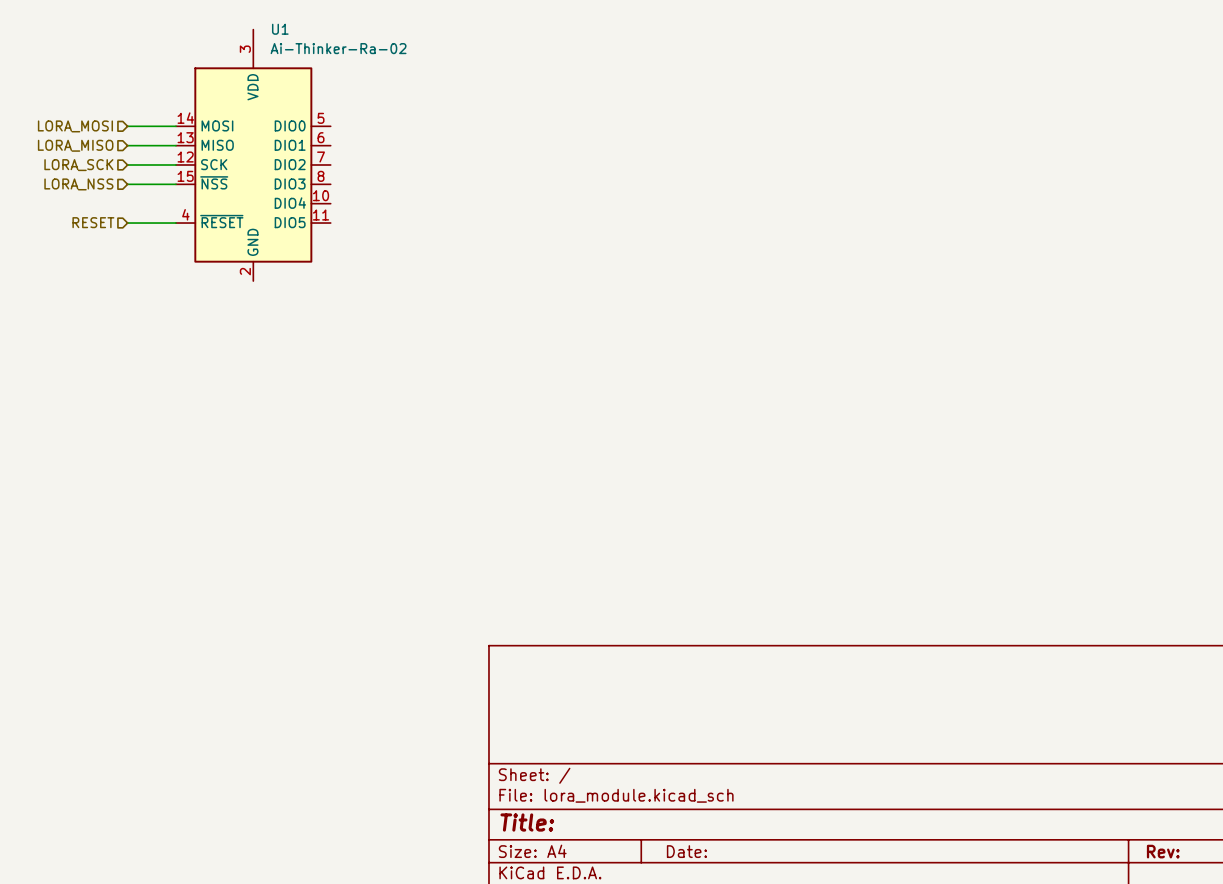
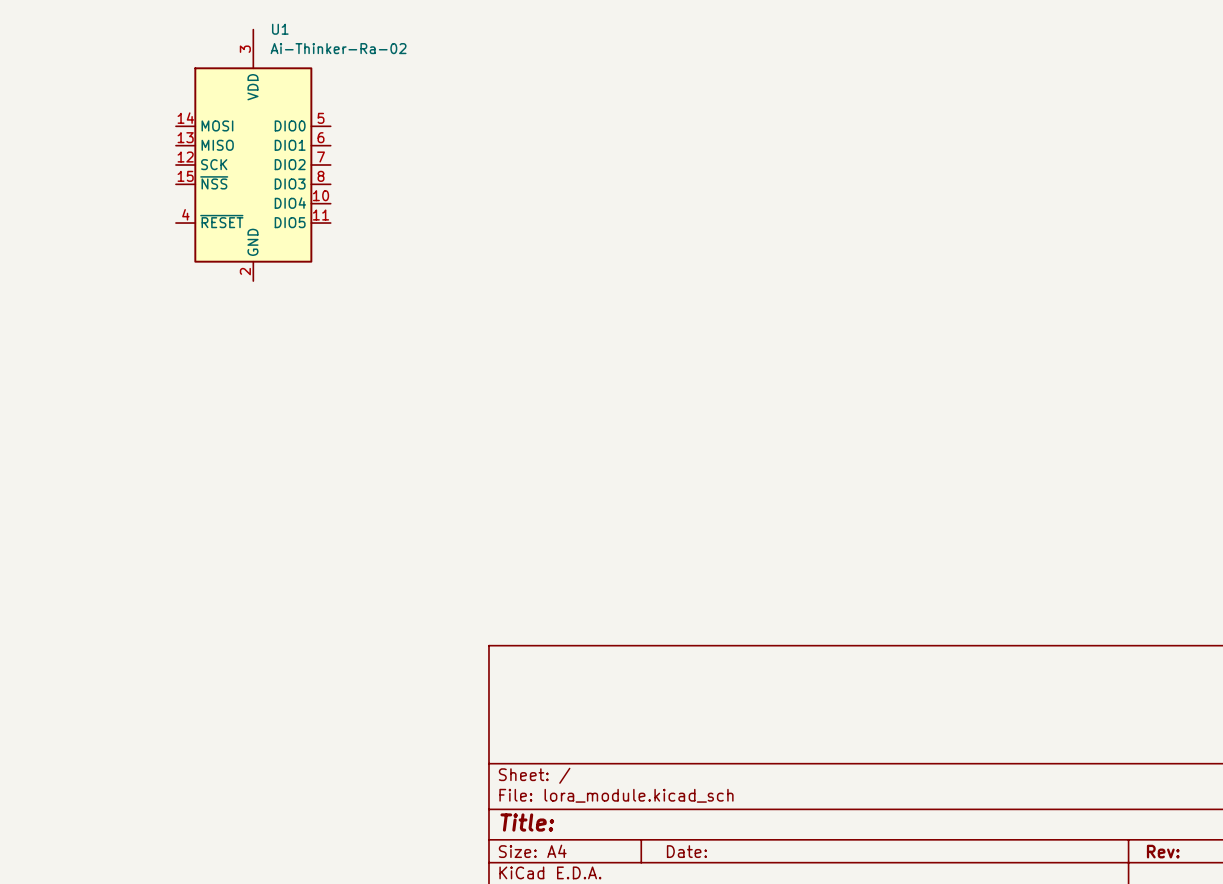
hierarchical label: LORA_MOSI (75, 126) -> none
wire: (127, 126) (175, 126) -> none
hierarchical label: LORA_MISO (75, 145) -> none
wire: (127, 145) (175, 145) -> none
wire: (127, 164) (175, 164) -> none
hierarchical label: LORA_SCK (78, 165) -> none
hierarchical label: LORA_NSS (78, 184) -> none
wire: (127, 184) (175, 184) -> none
hierarchical label: RESET (93, 222) -> none
wire: (127, 223) (175, 223) -> none

